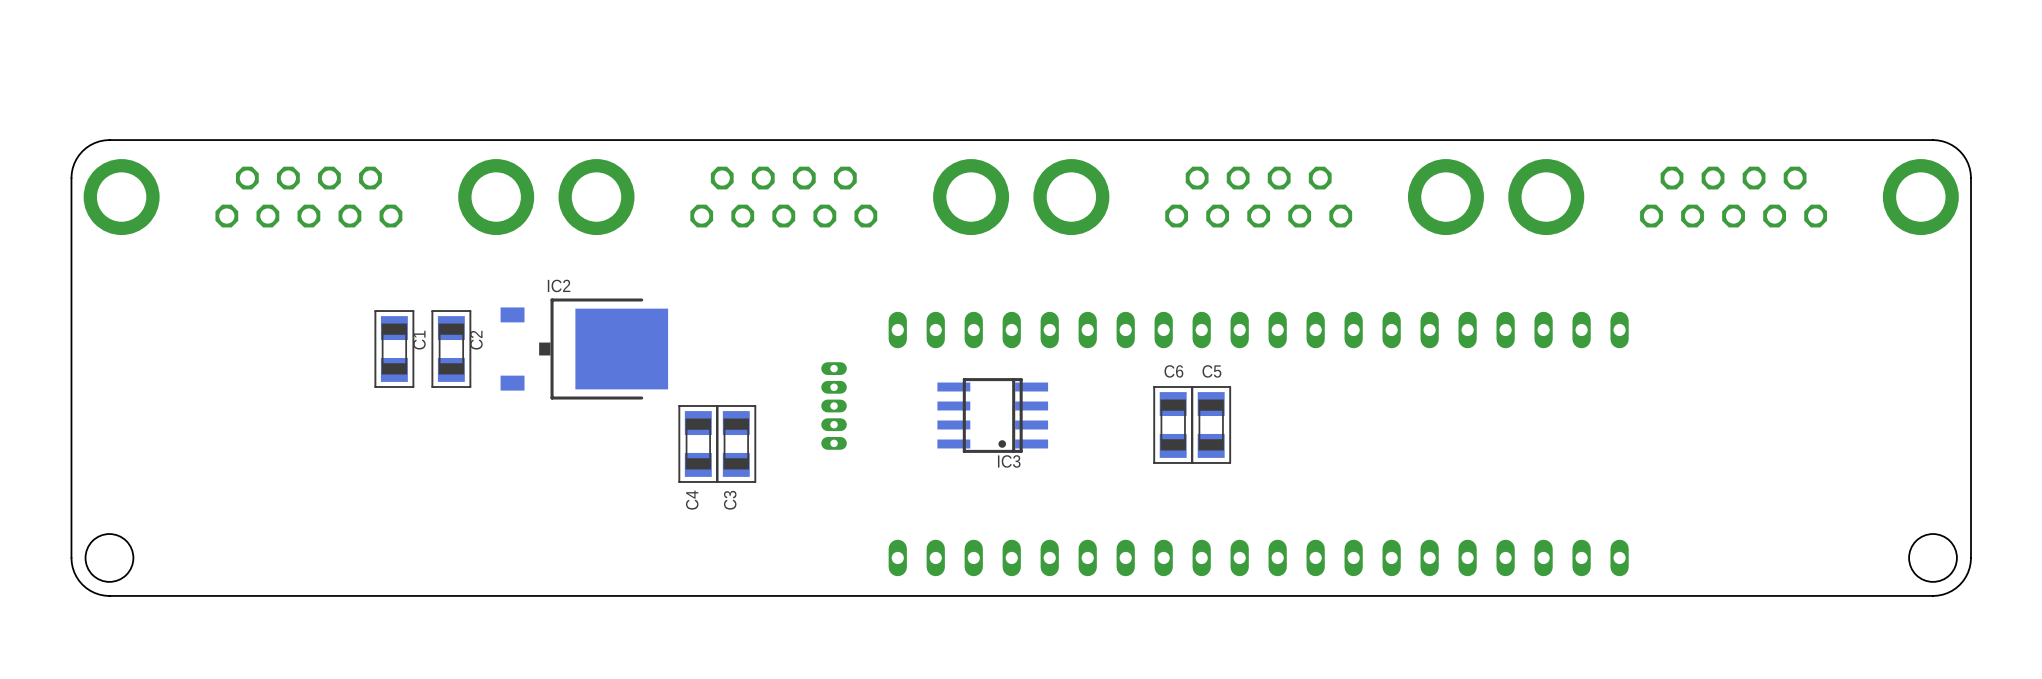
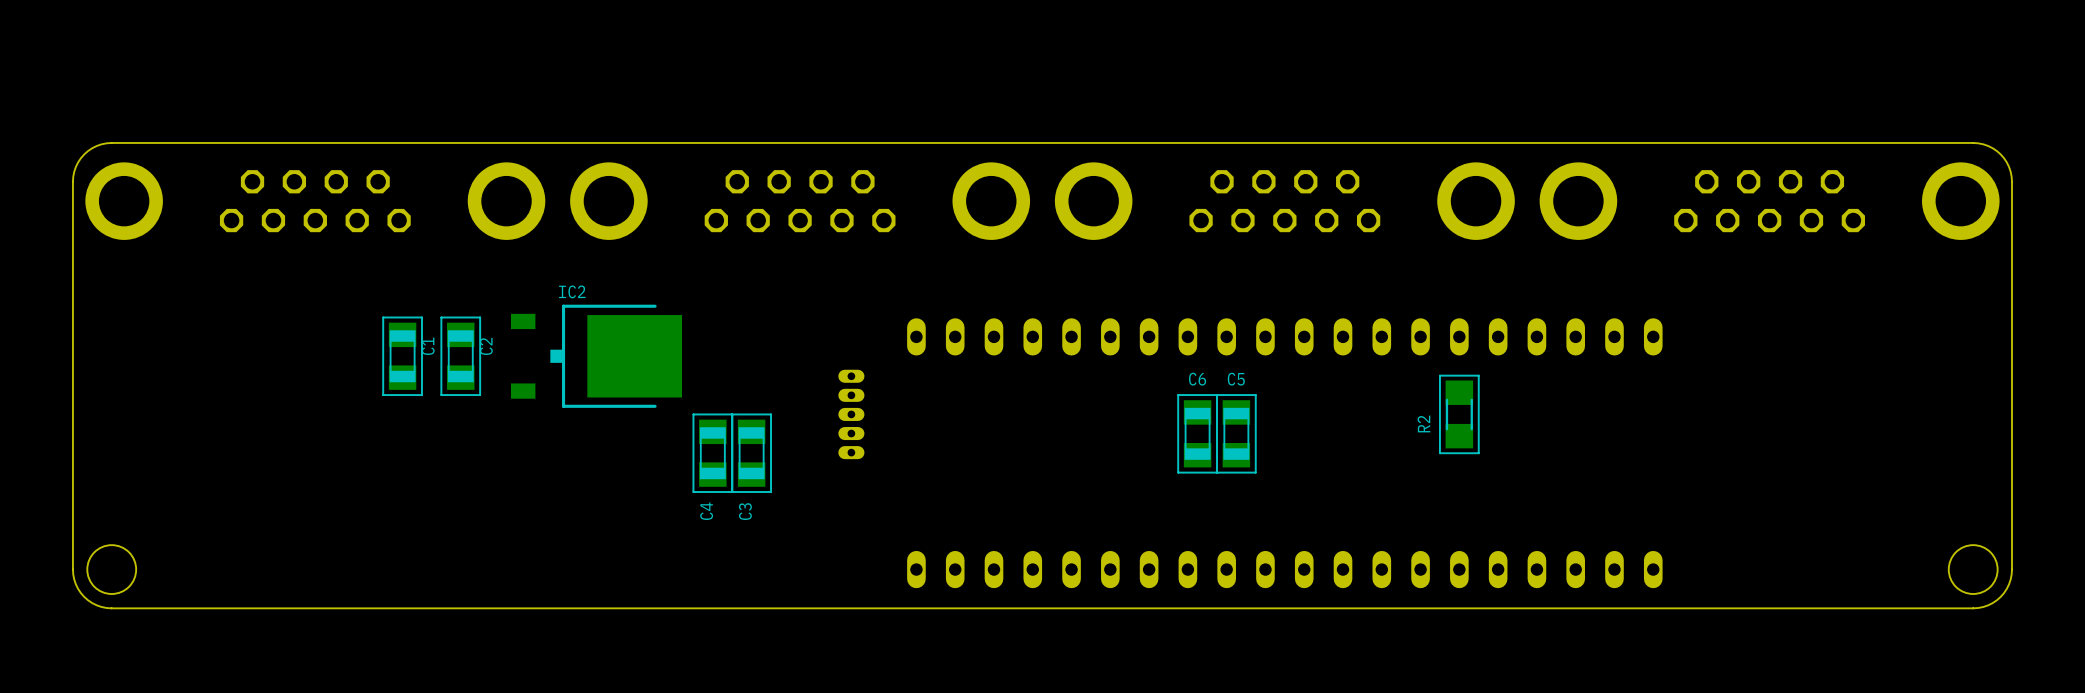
R2: none -> (1459, 414)
IC3: (992, 415) -> none

